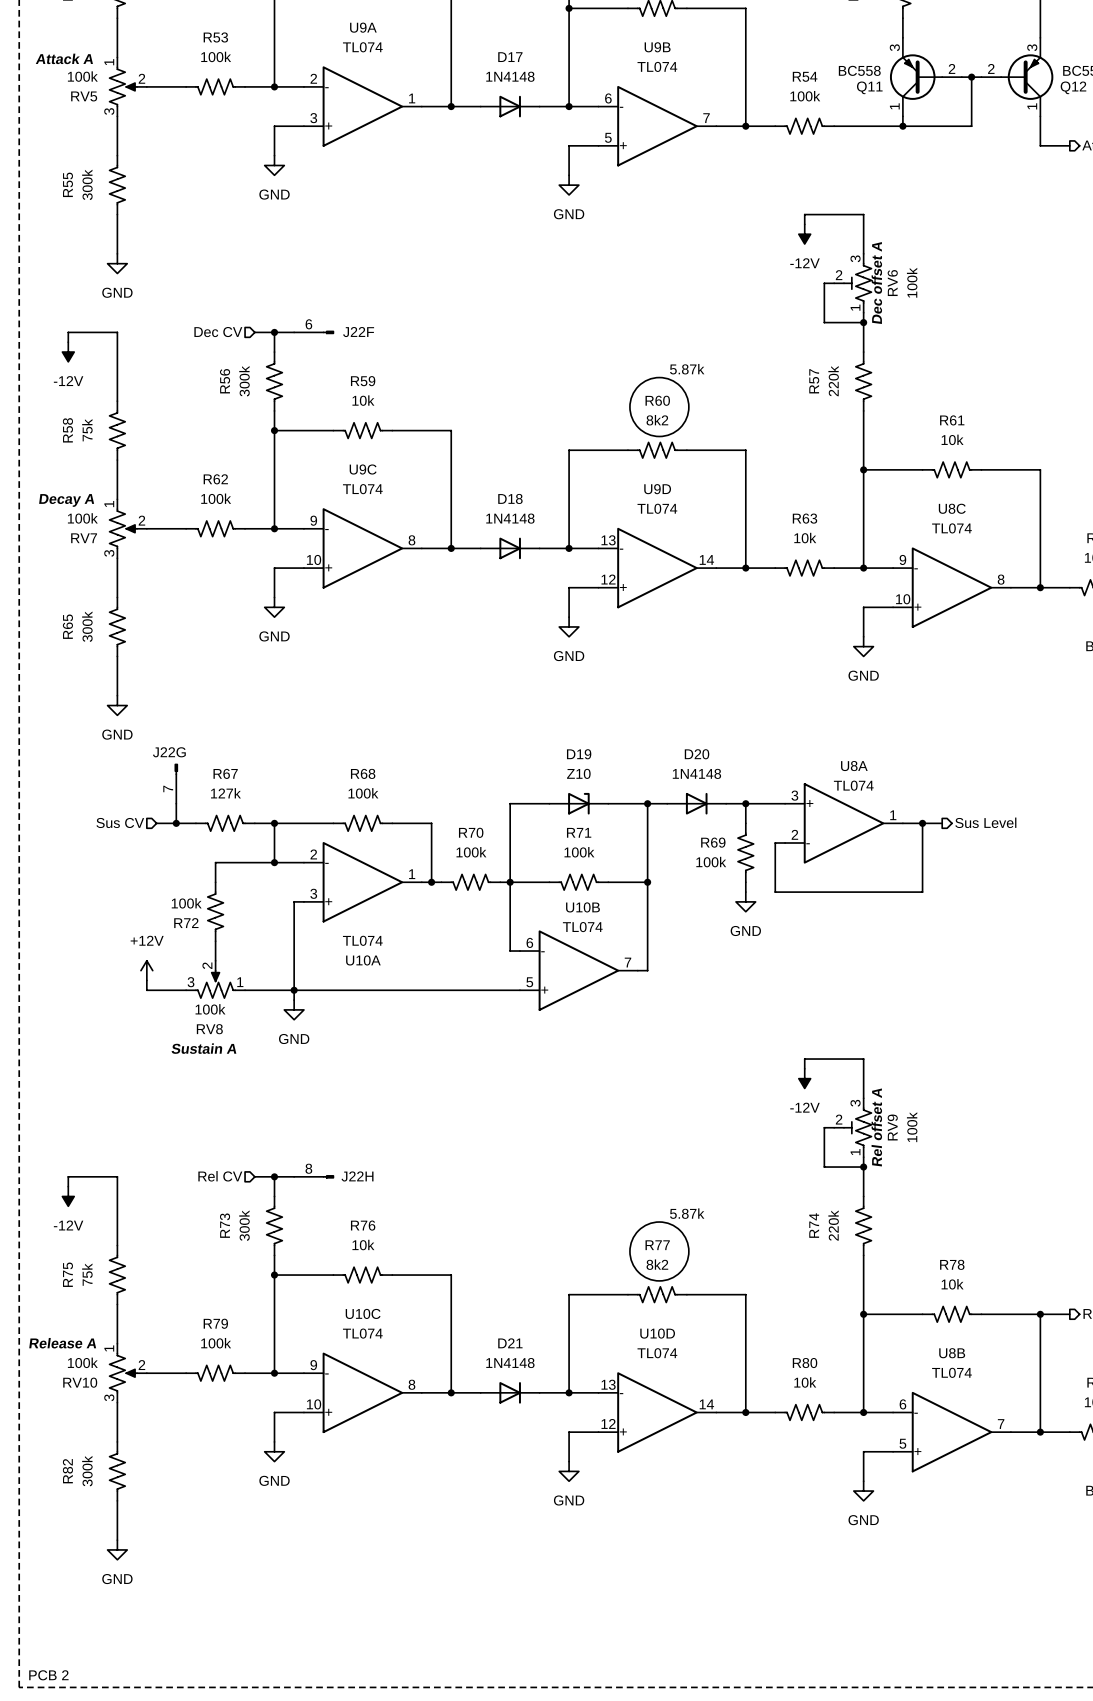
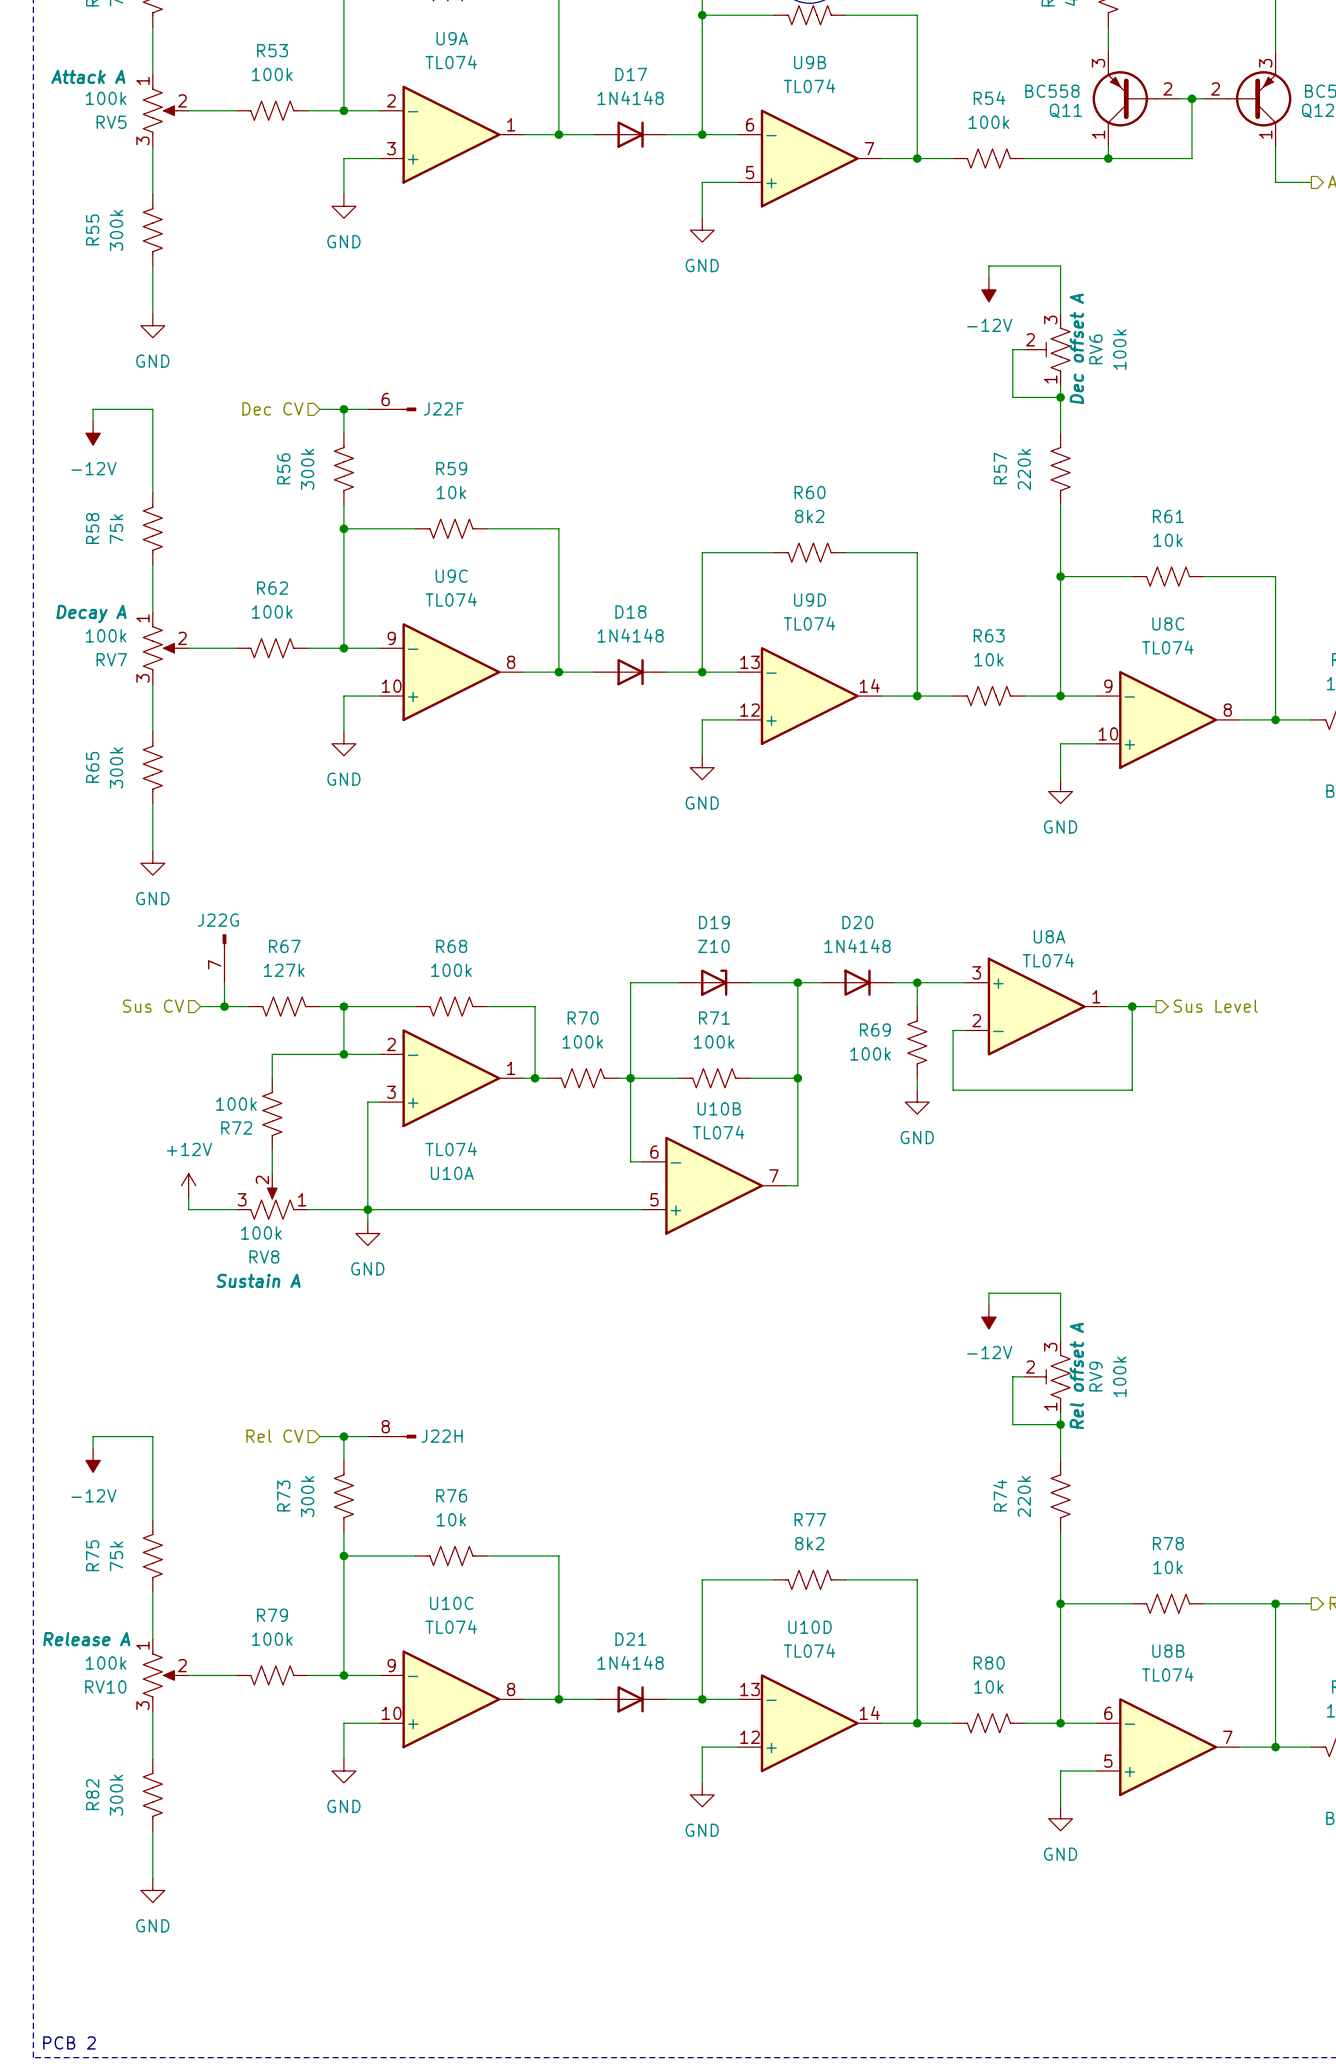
text: 5.87k (687, 369) -> none
drawing: [629, 377, 689, 437] -> none
text: 5.87k (687, 1213) -> none
drawing: [629, 1222, 689, 1281] -> none

